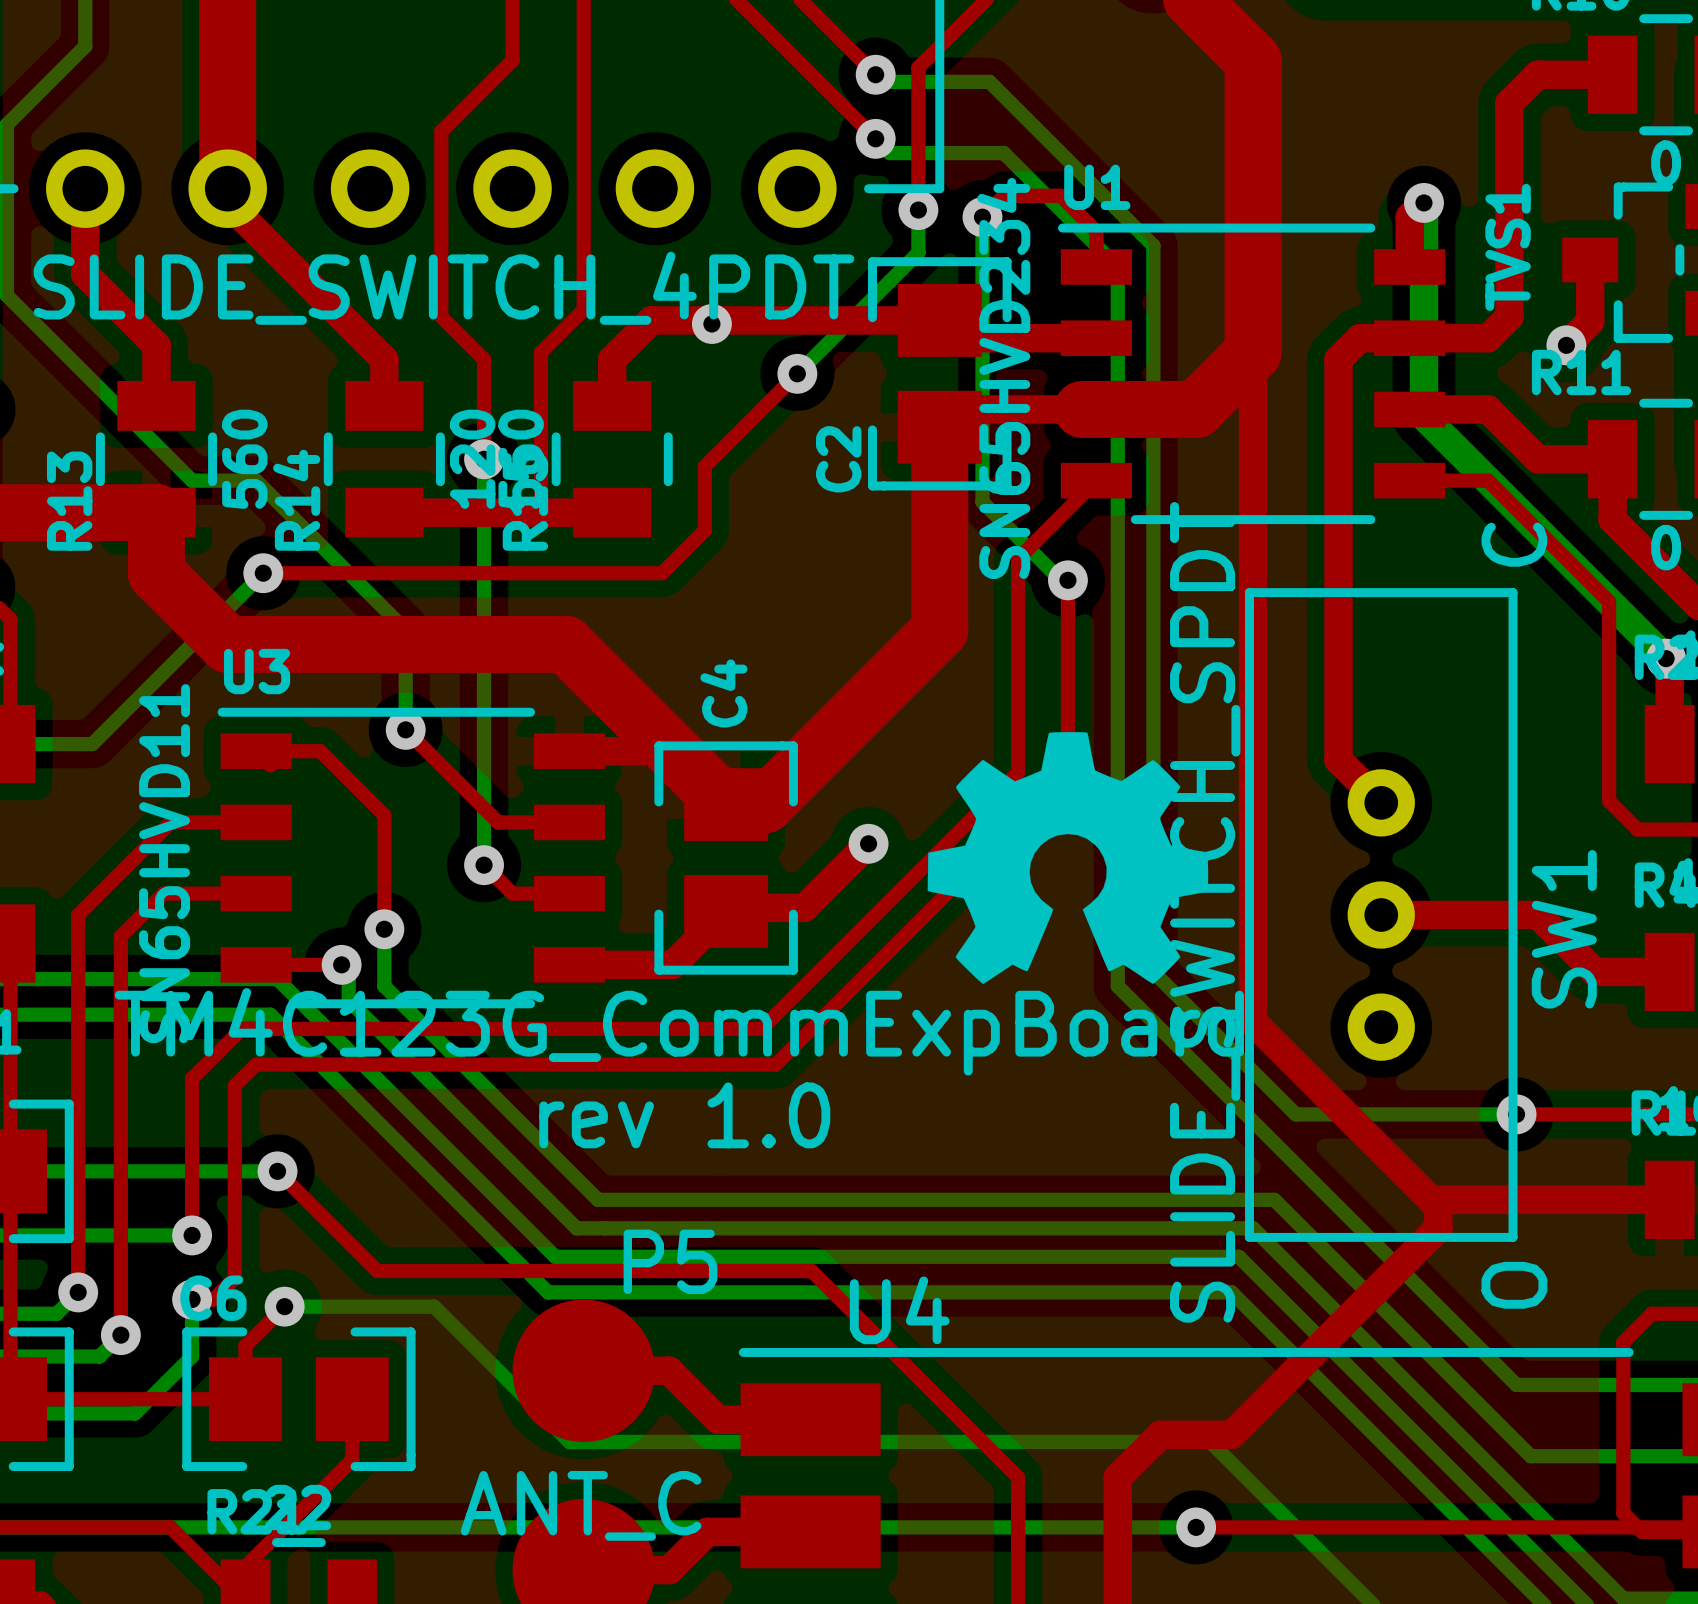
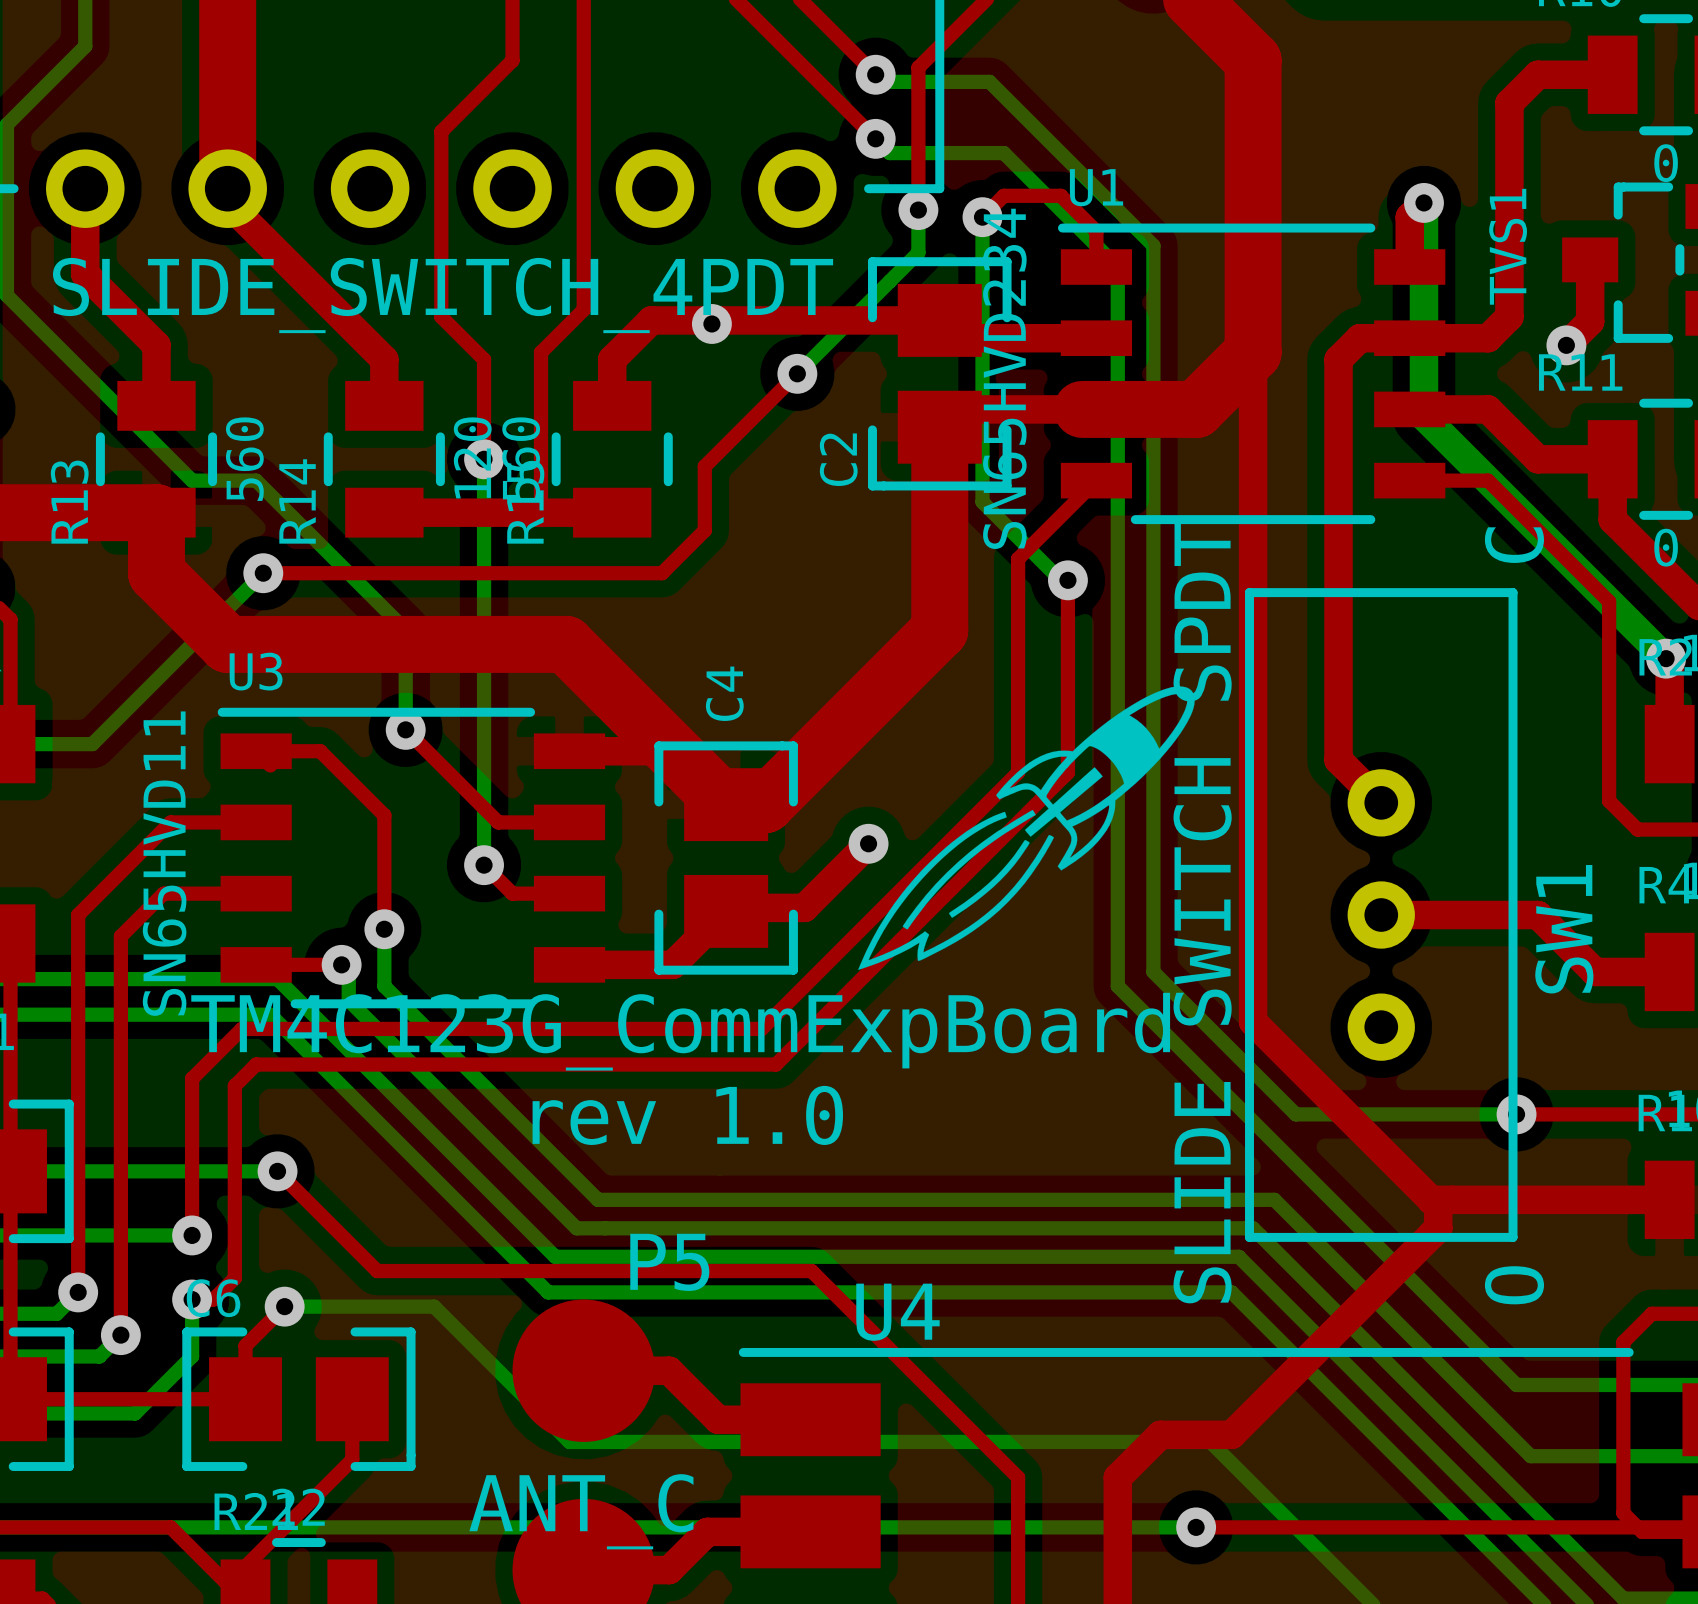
drawing shape: [927, 732, 1209, 985] -> [858, 686, 1195, 970]

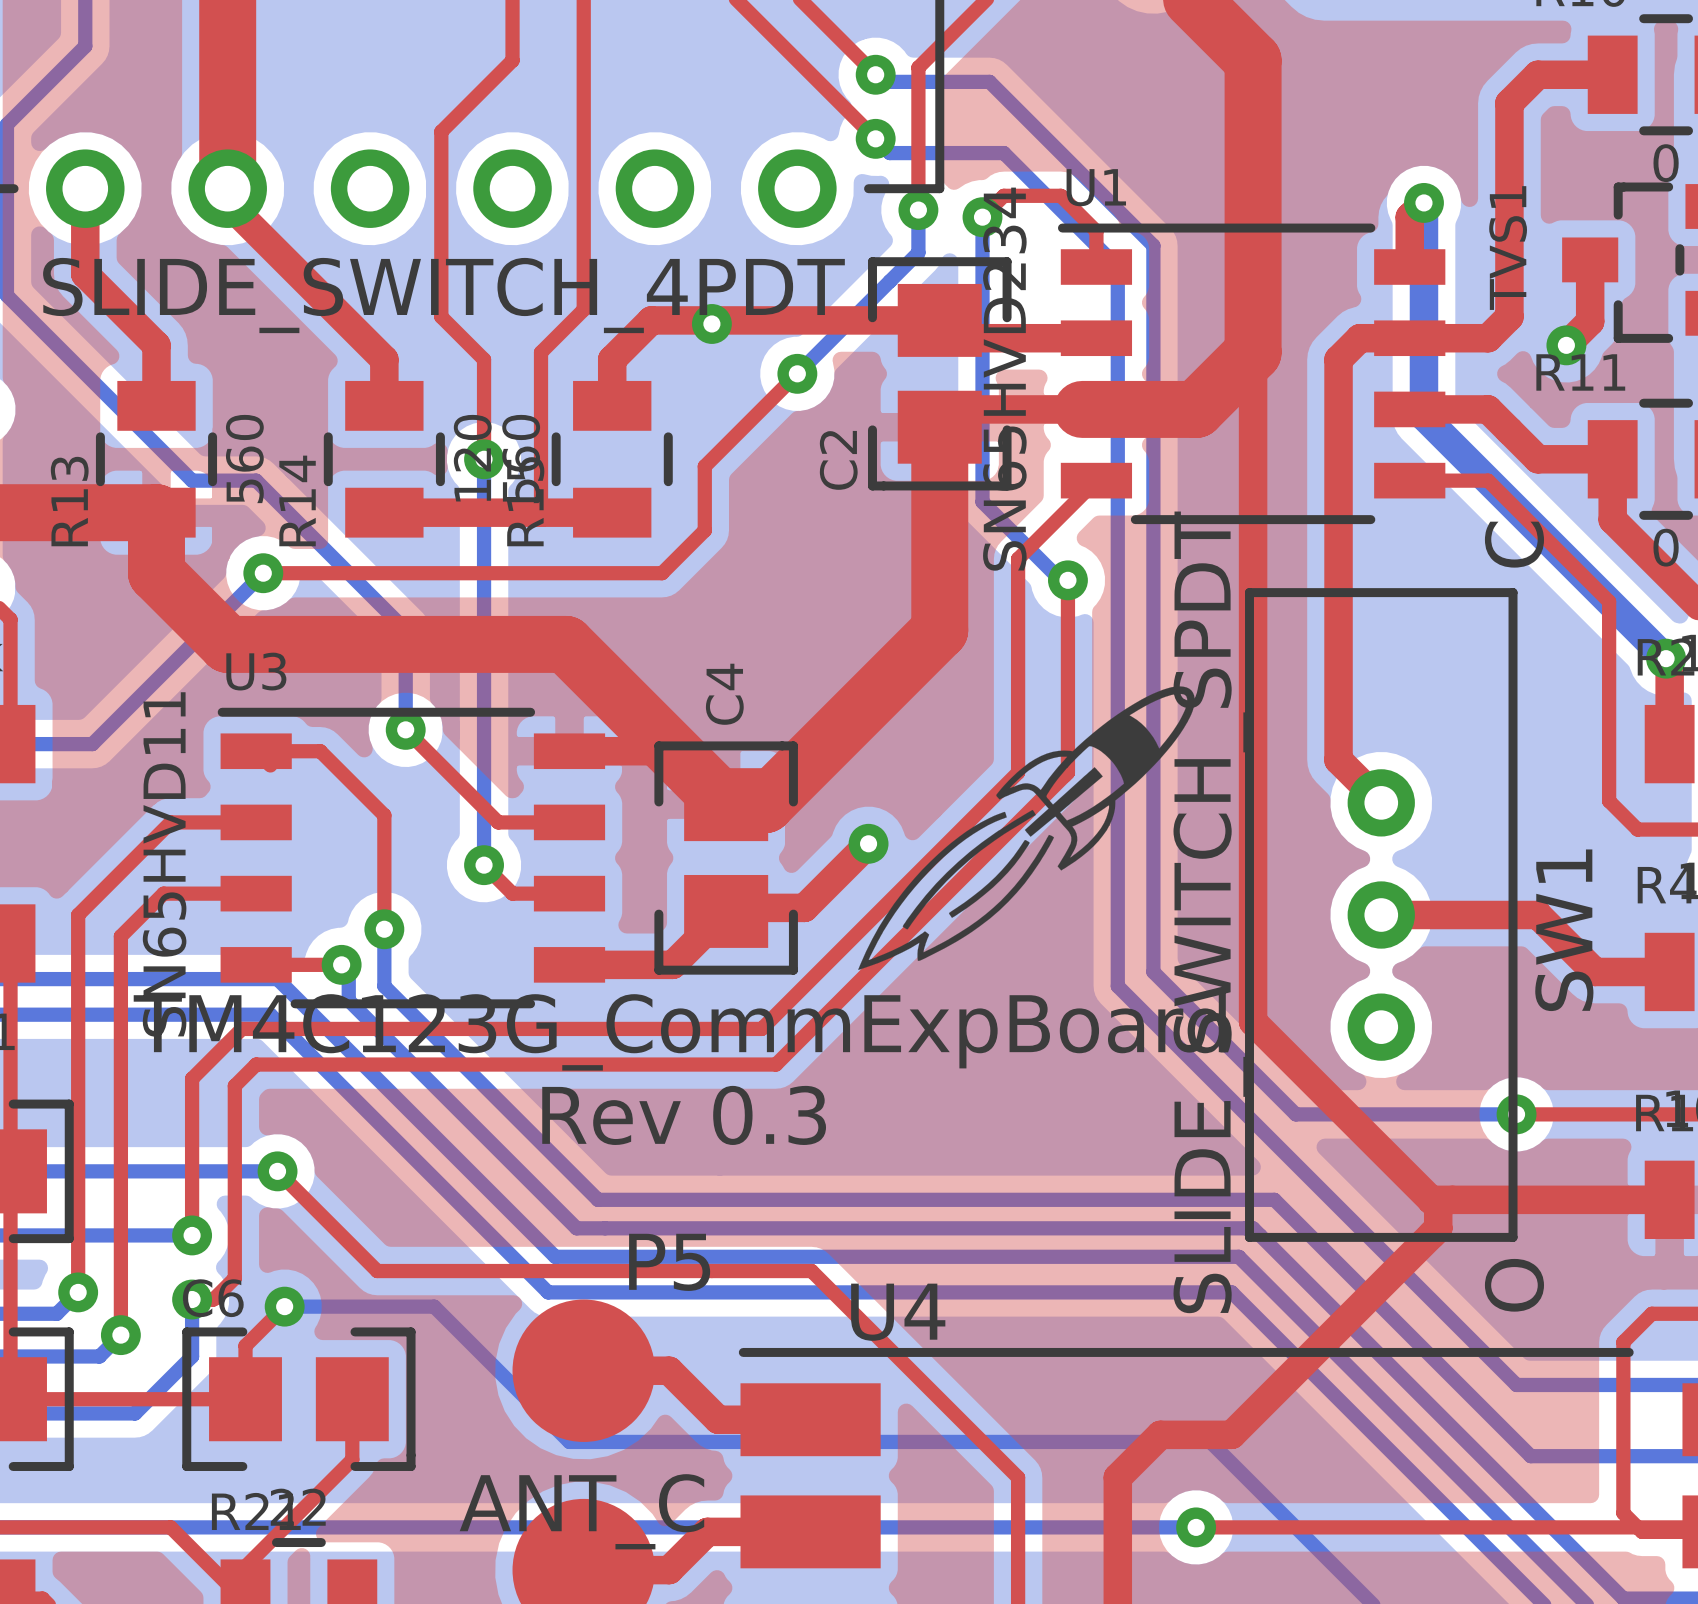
text: rev 1.0 (687, 1115) -> Rev 0.3 (684, 1115)

